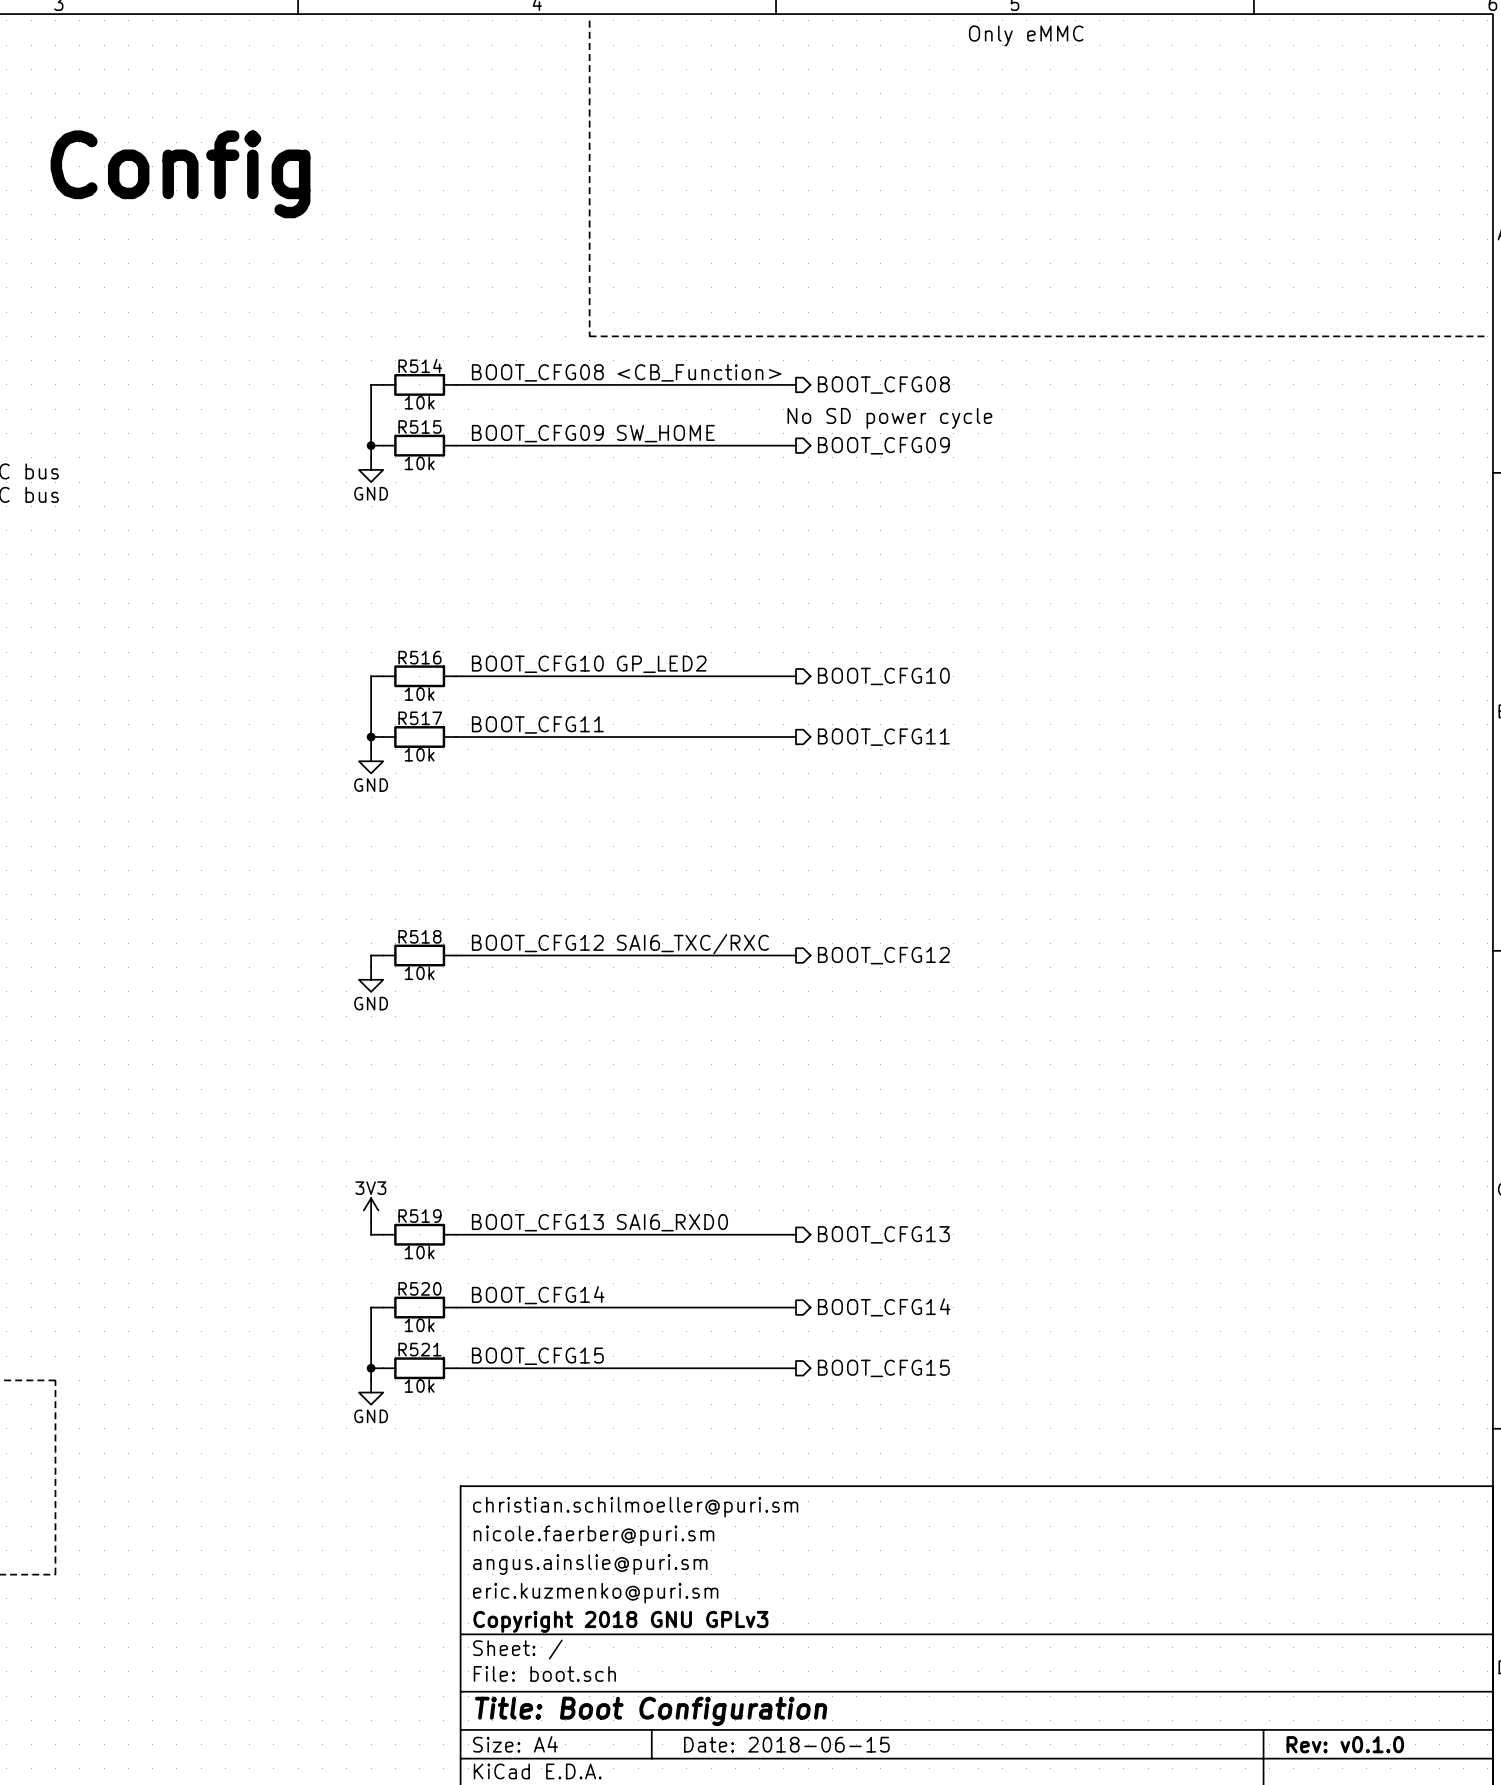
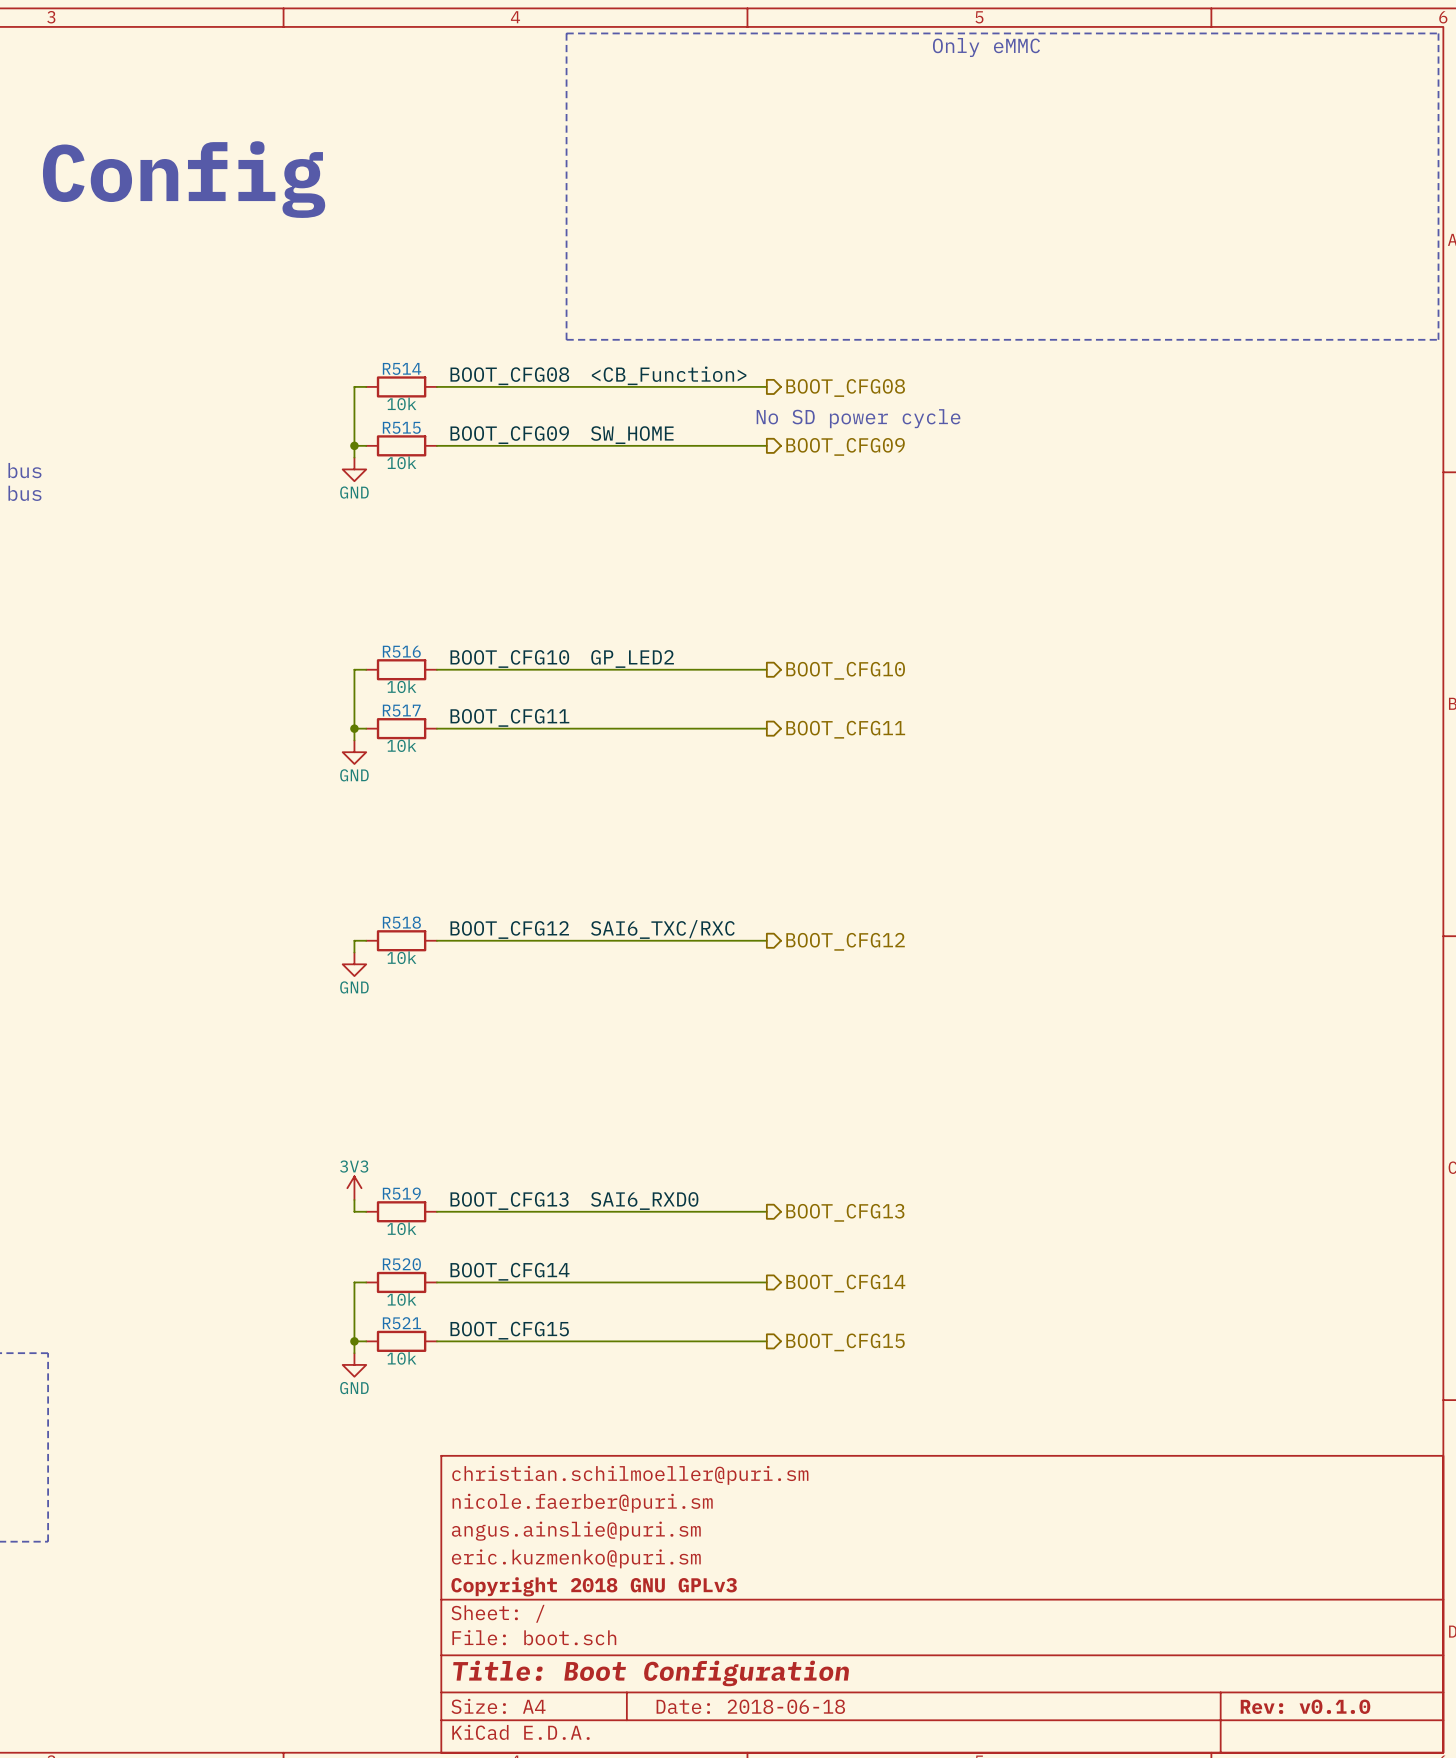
line: none -> (566, 33) (1438, 33) (1438, 339)
title block: Date: 2018-06-15 (786, 1744) -> Date: 2018-06-18 (750, 1706)

